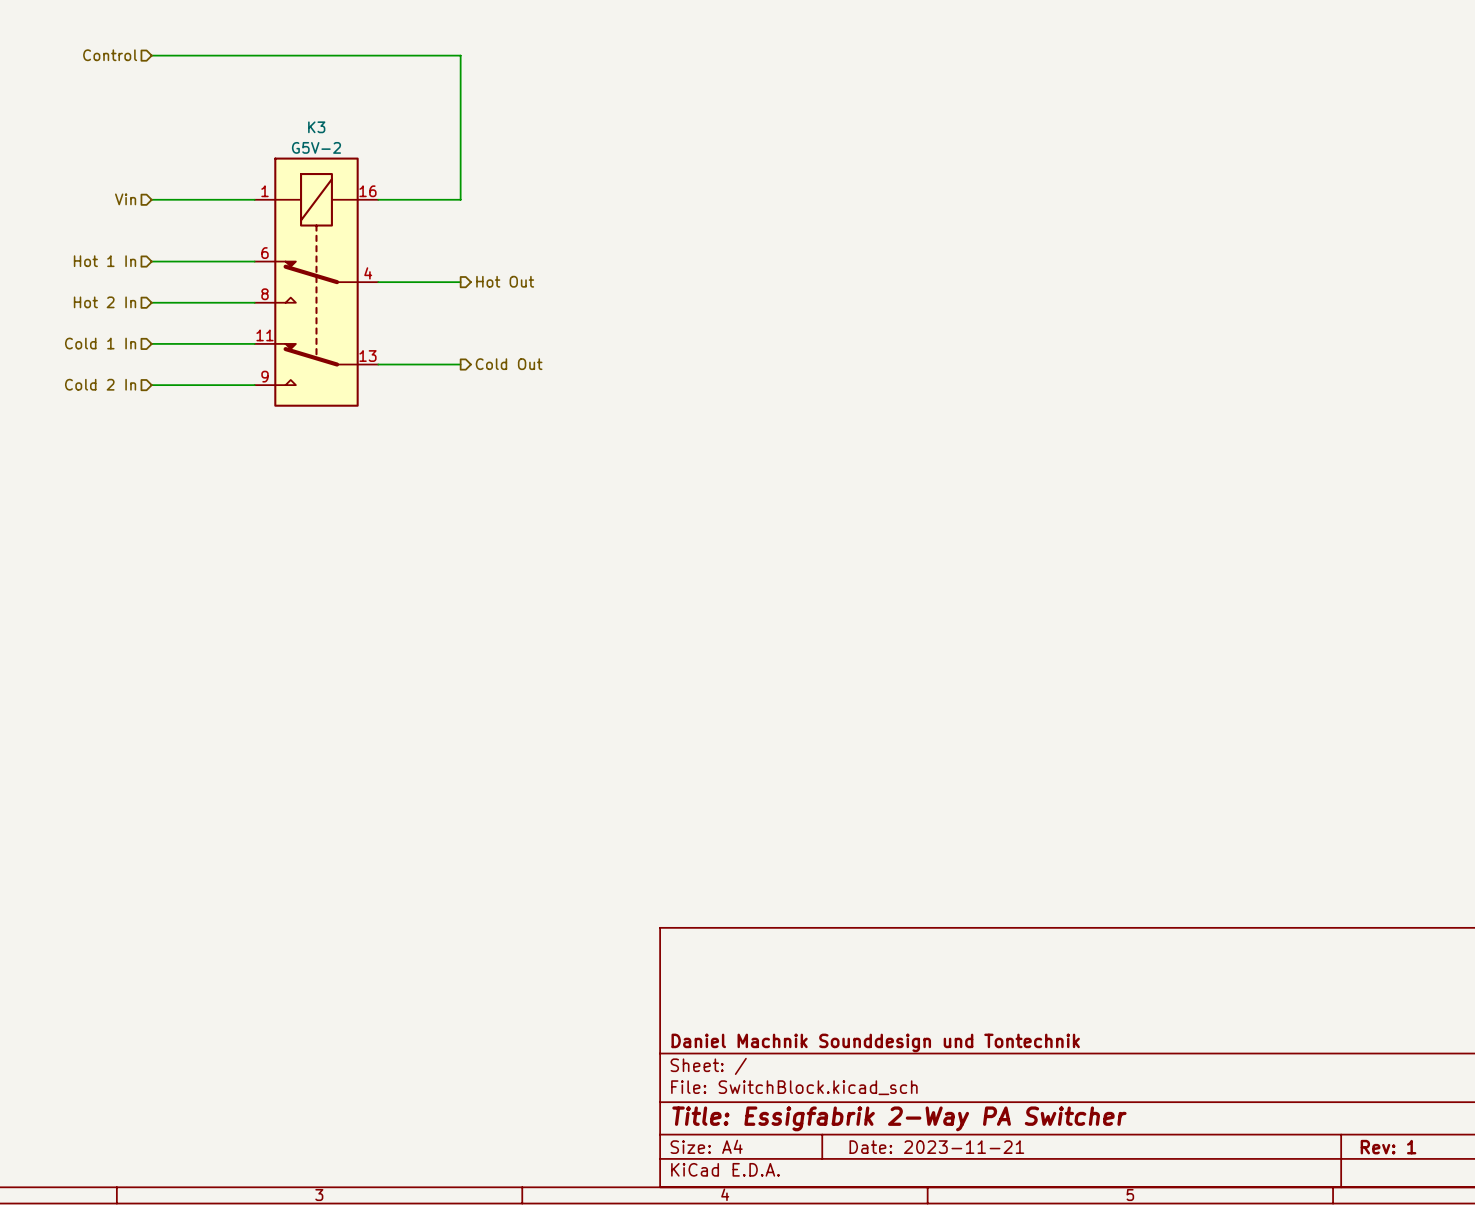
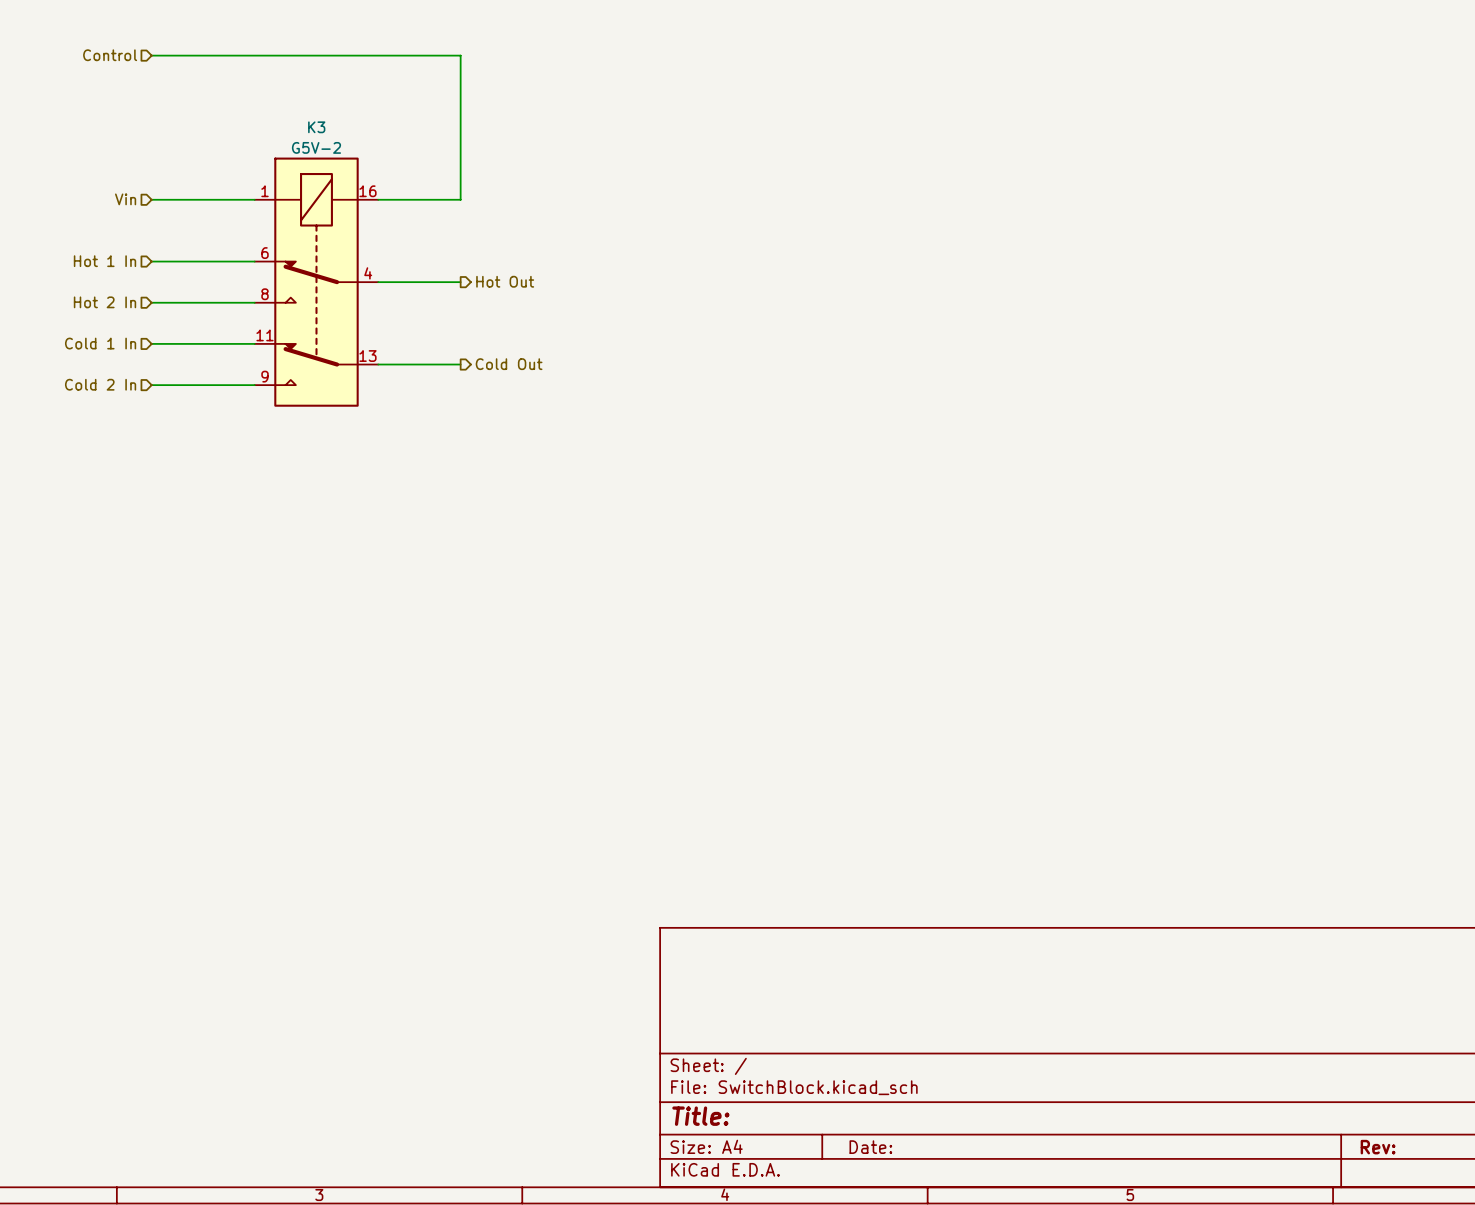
title block: Daniel Machnik Sounddesign und Tontechnik (875, 1042) -> none
title block: Title: Essigfabrik 2-Way PA Switcher (899, 1118) -> Title: (700, 1116)
title block: Date: 2023-11-21 (936, 1147) -> Date: (870, 1147)
title block: Rev: 1 (1388, 1147) -> Rev: (1378, 1147)

